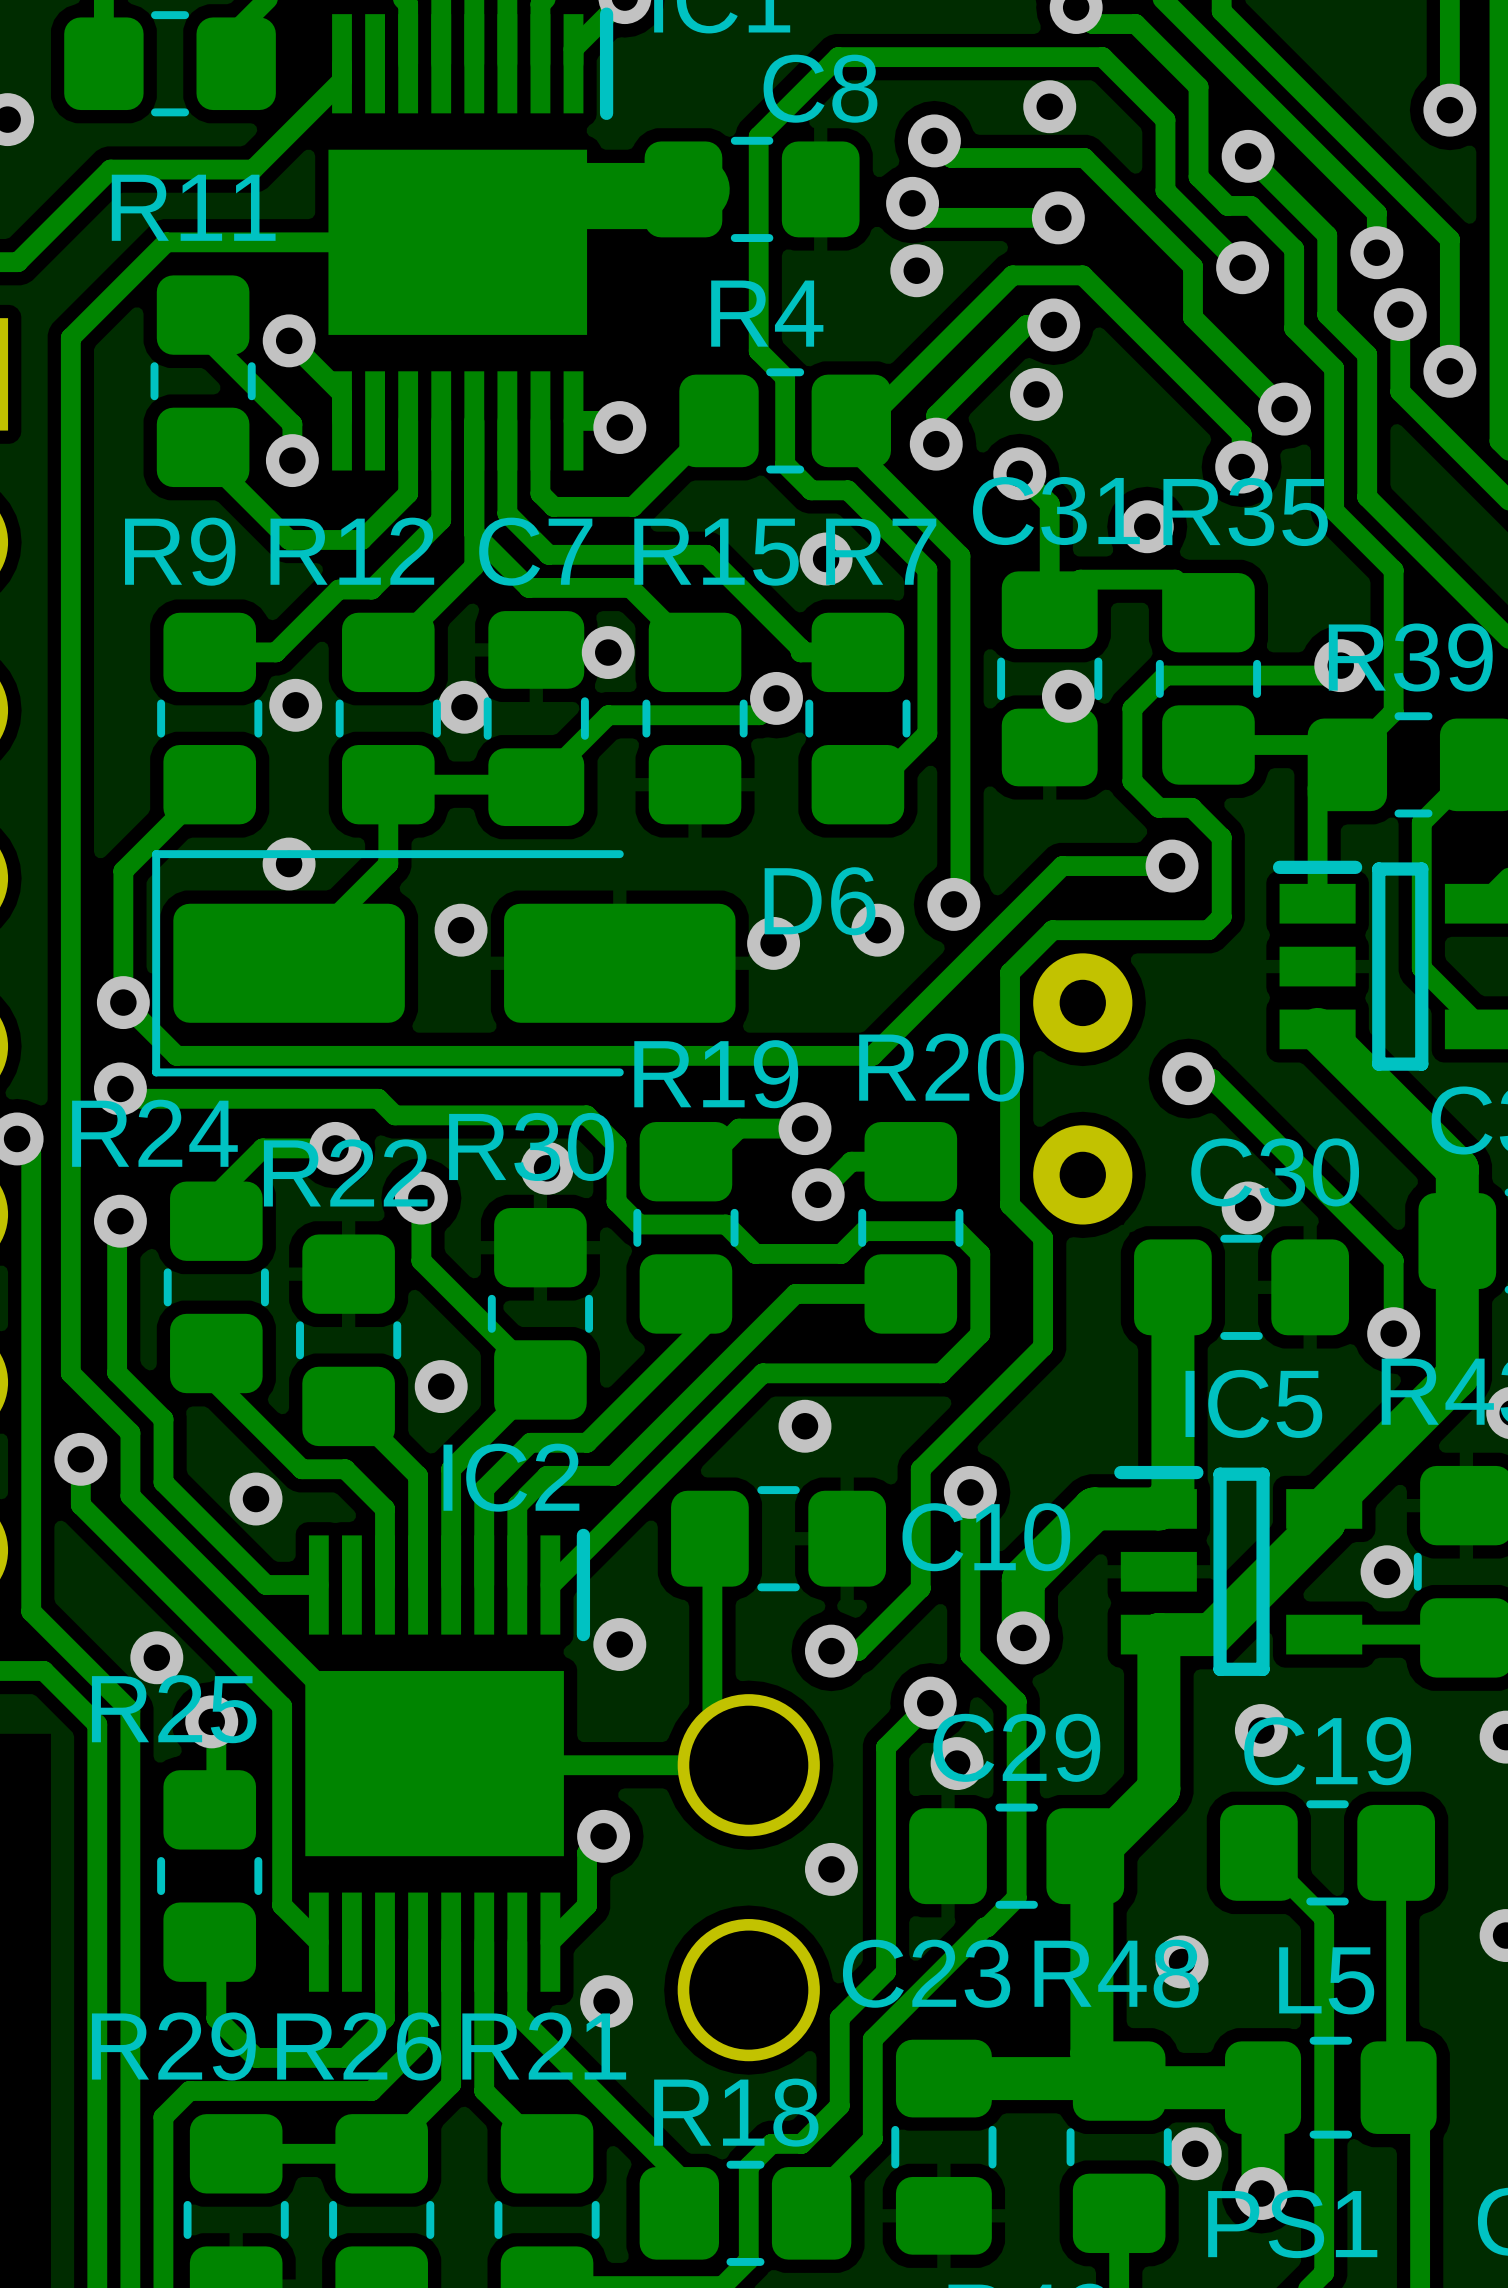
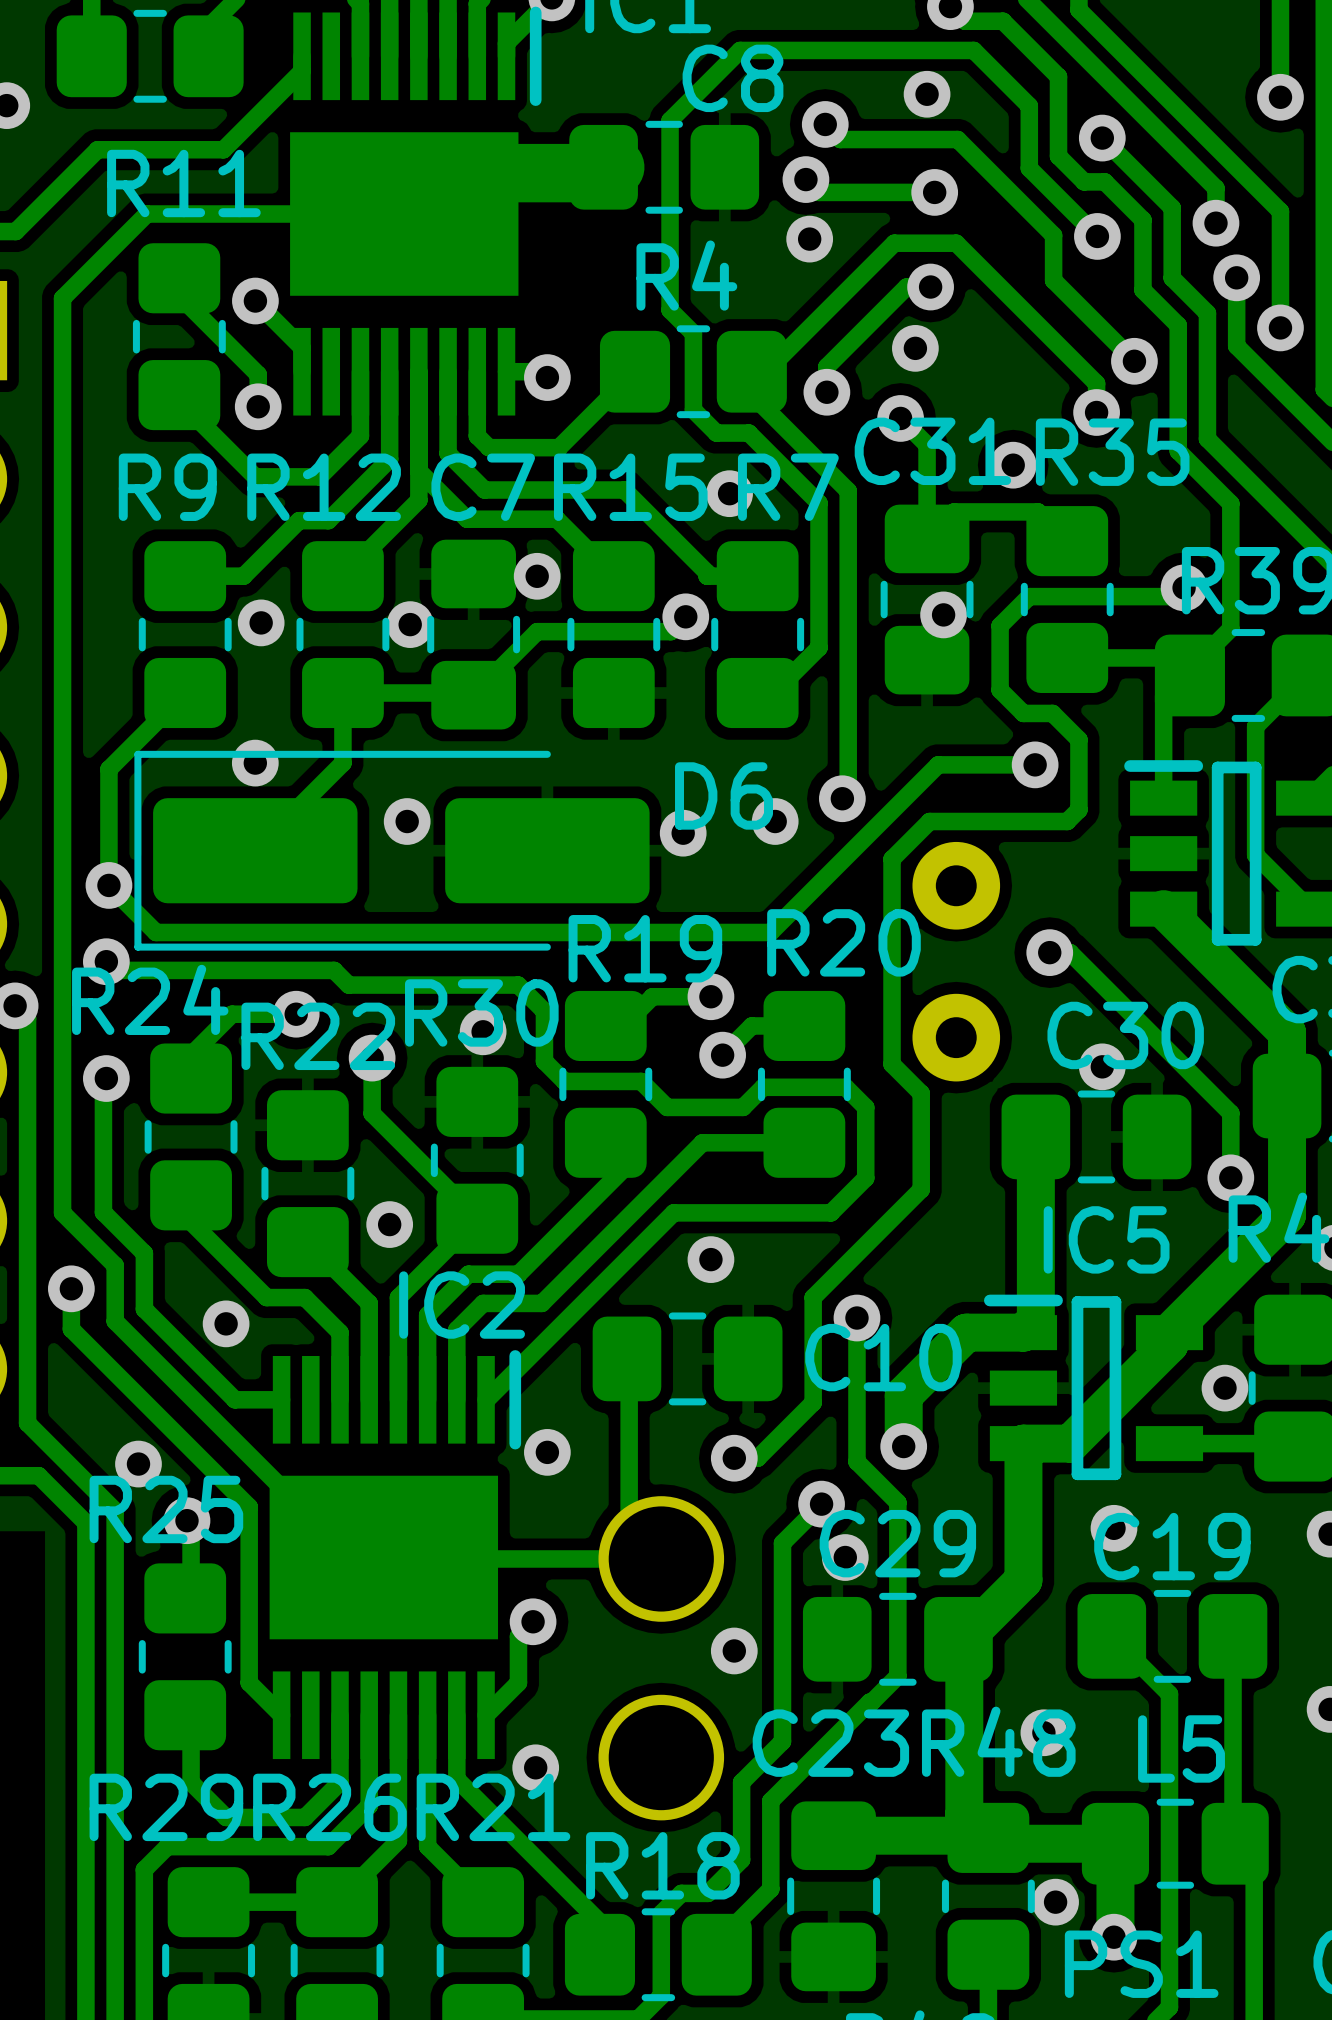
R15 name position: R15 (716, 552) -> R15 (630, 487)

